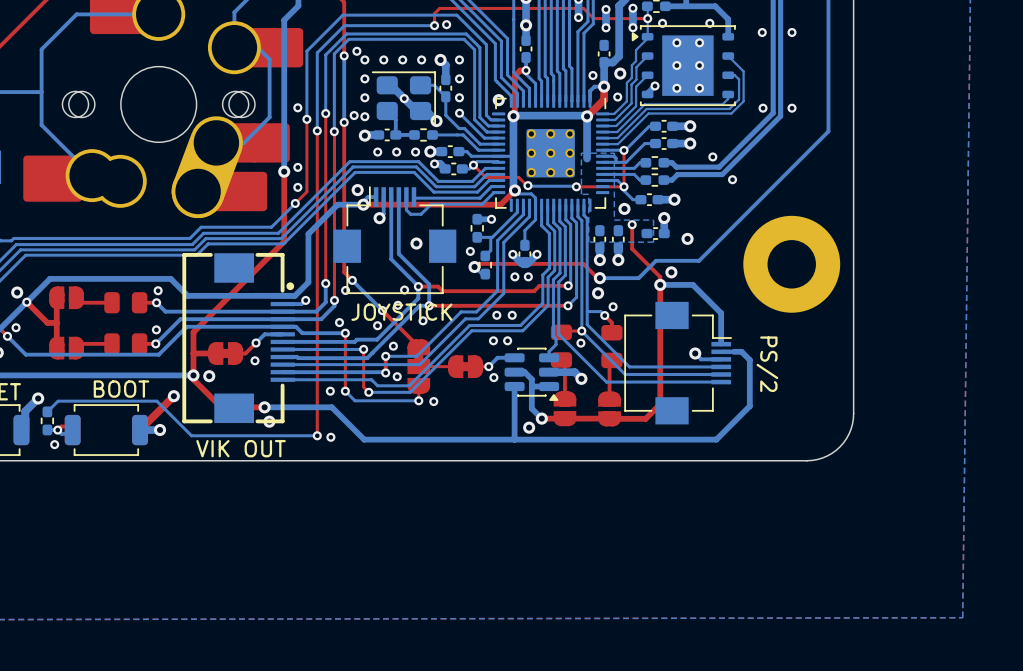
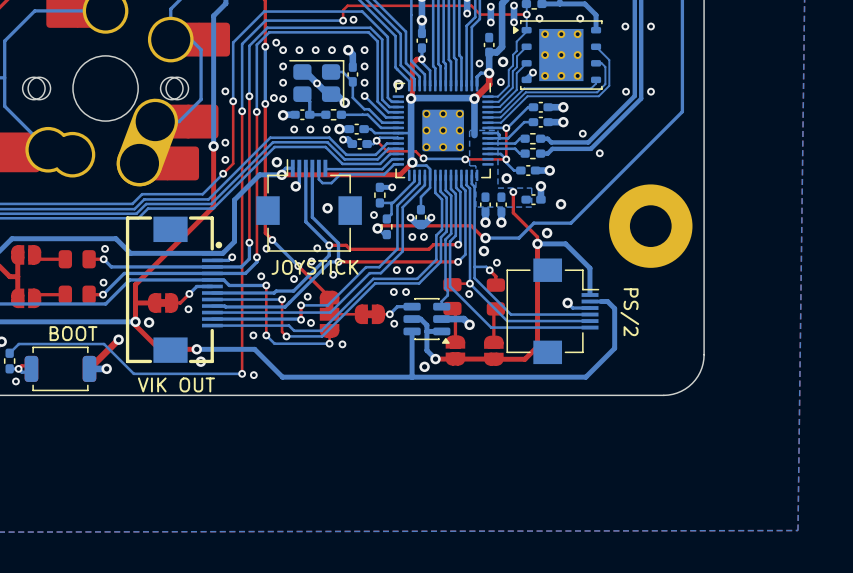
part footprint: [631, 25, 736, 107] -> [512, 20, 603, 90]
via: (676, 42) -> none
via: (699, 42) -> none
via: (676, 65) -> none
via: (699, 65) -> none
via: (676, 88) -> none
via: (699, 88) -> none

